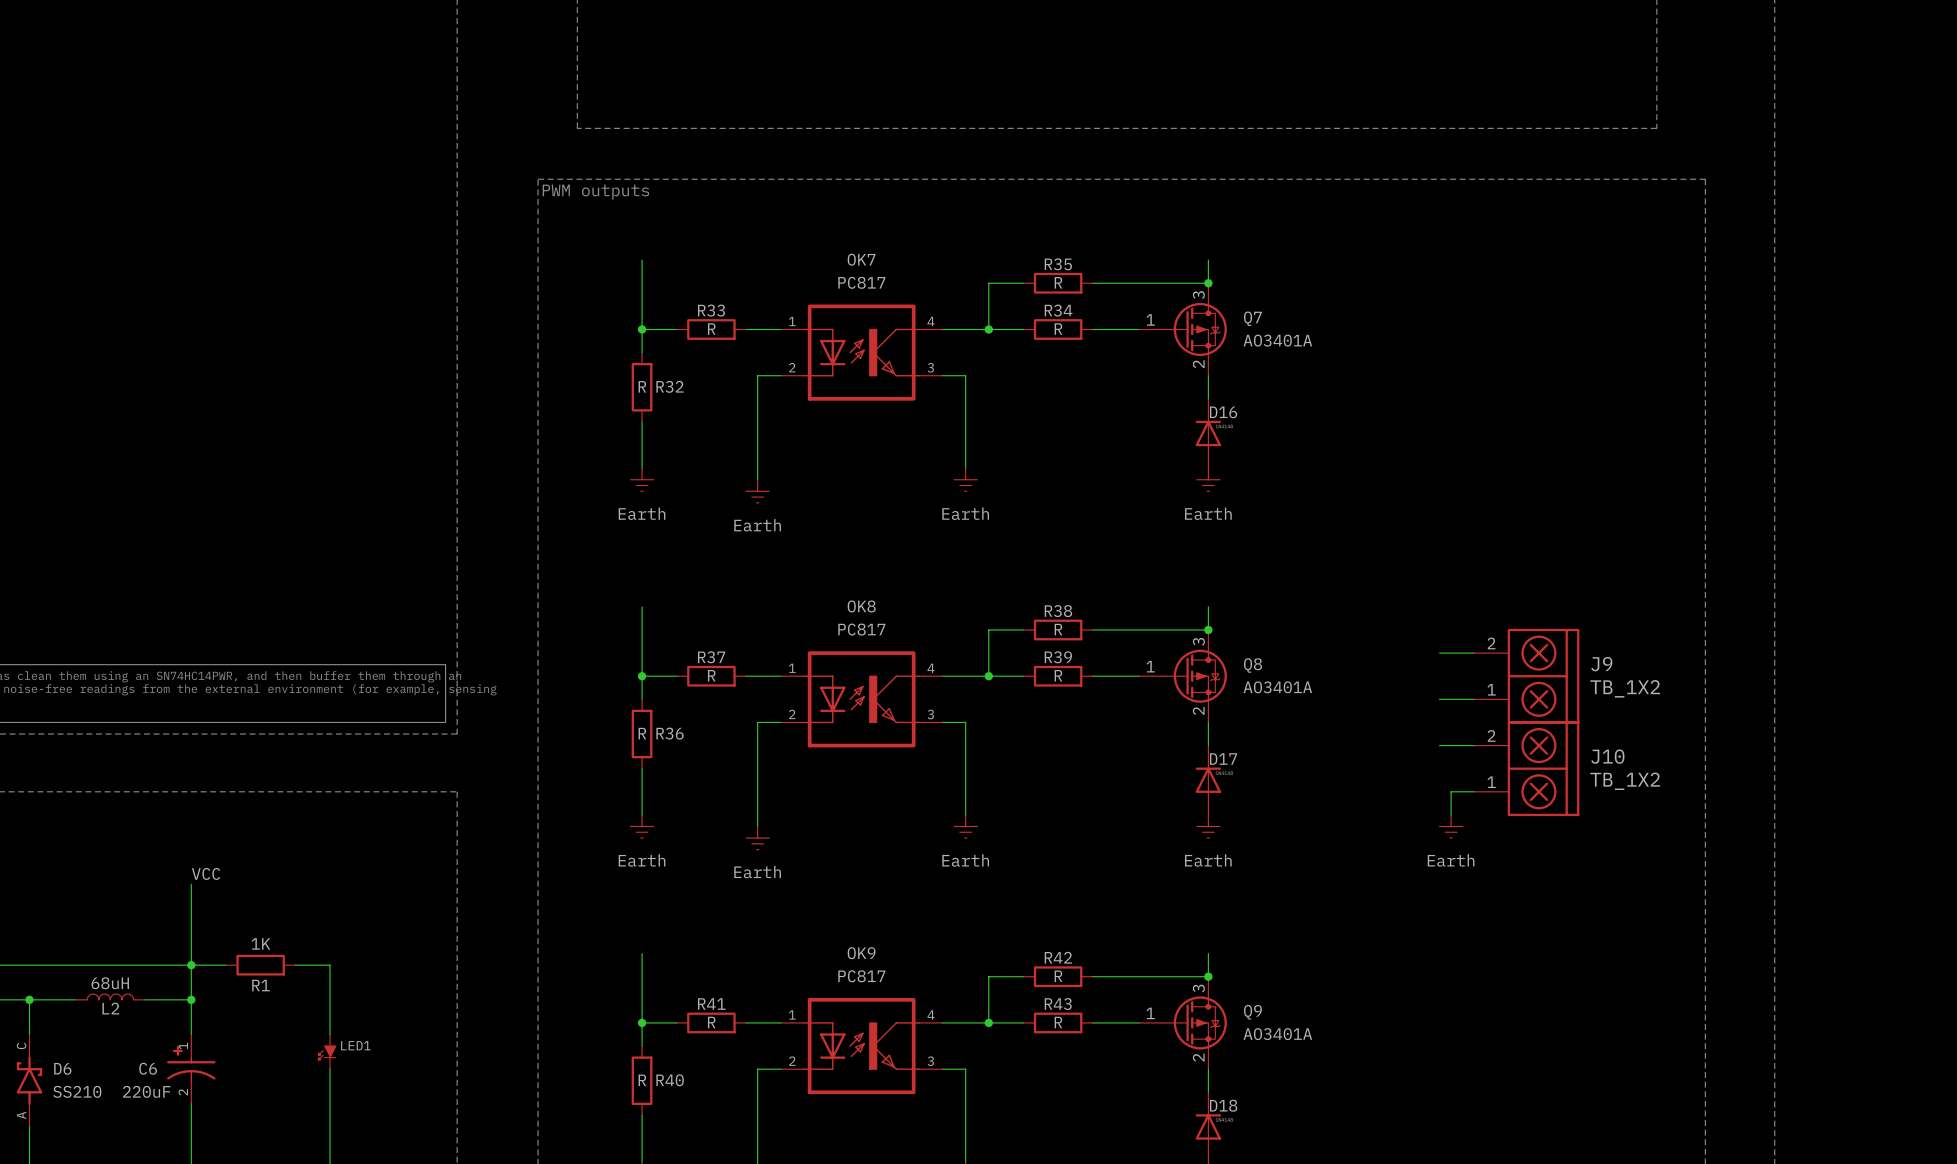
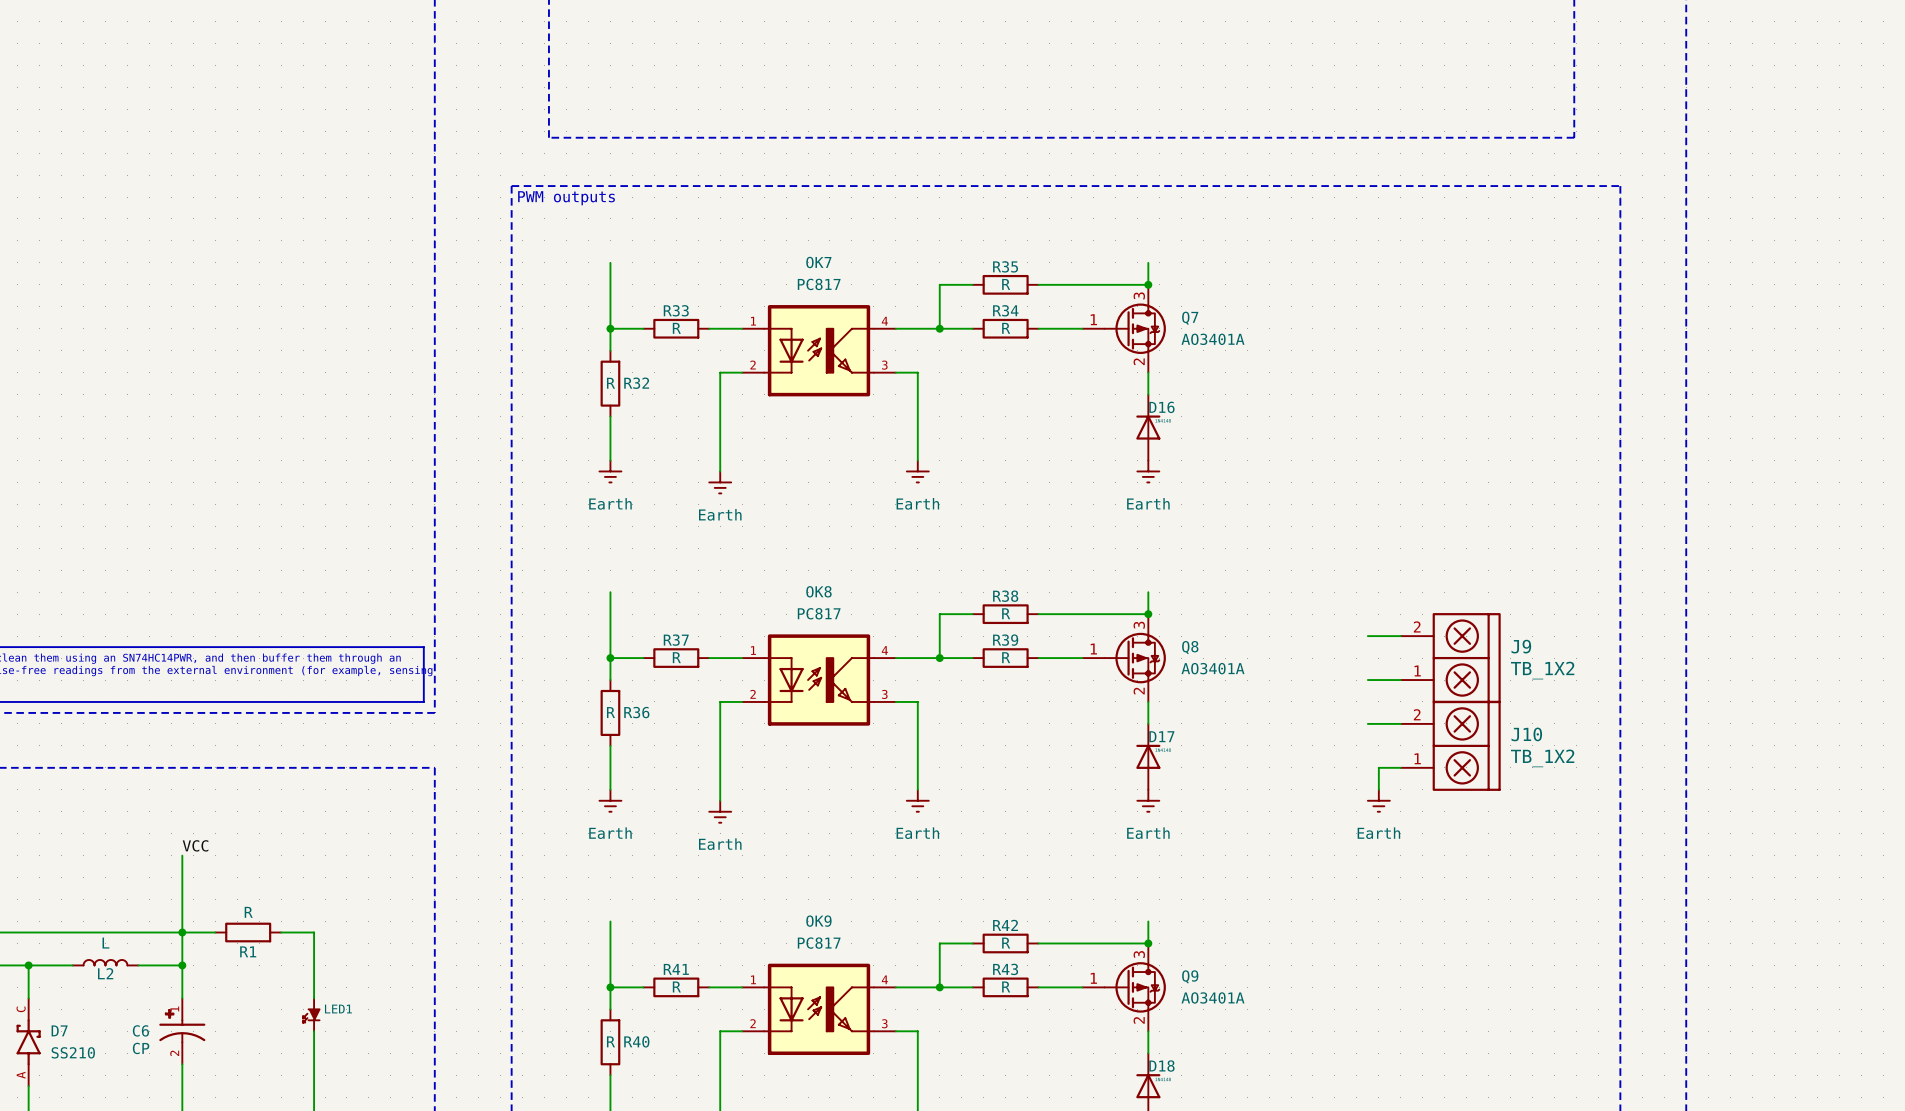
R1 value: 1K (260, 943) -> R (248, 912)
L2 value: 68uH (110, 983) -> L (105, 943)
D6 name: D6 (62, 1068) -> D7 (59, 1030)
C6 value: 220uF (146, 1091) -> CP (141, 1048)

